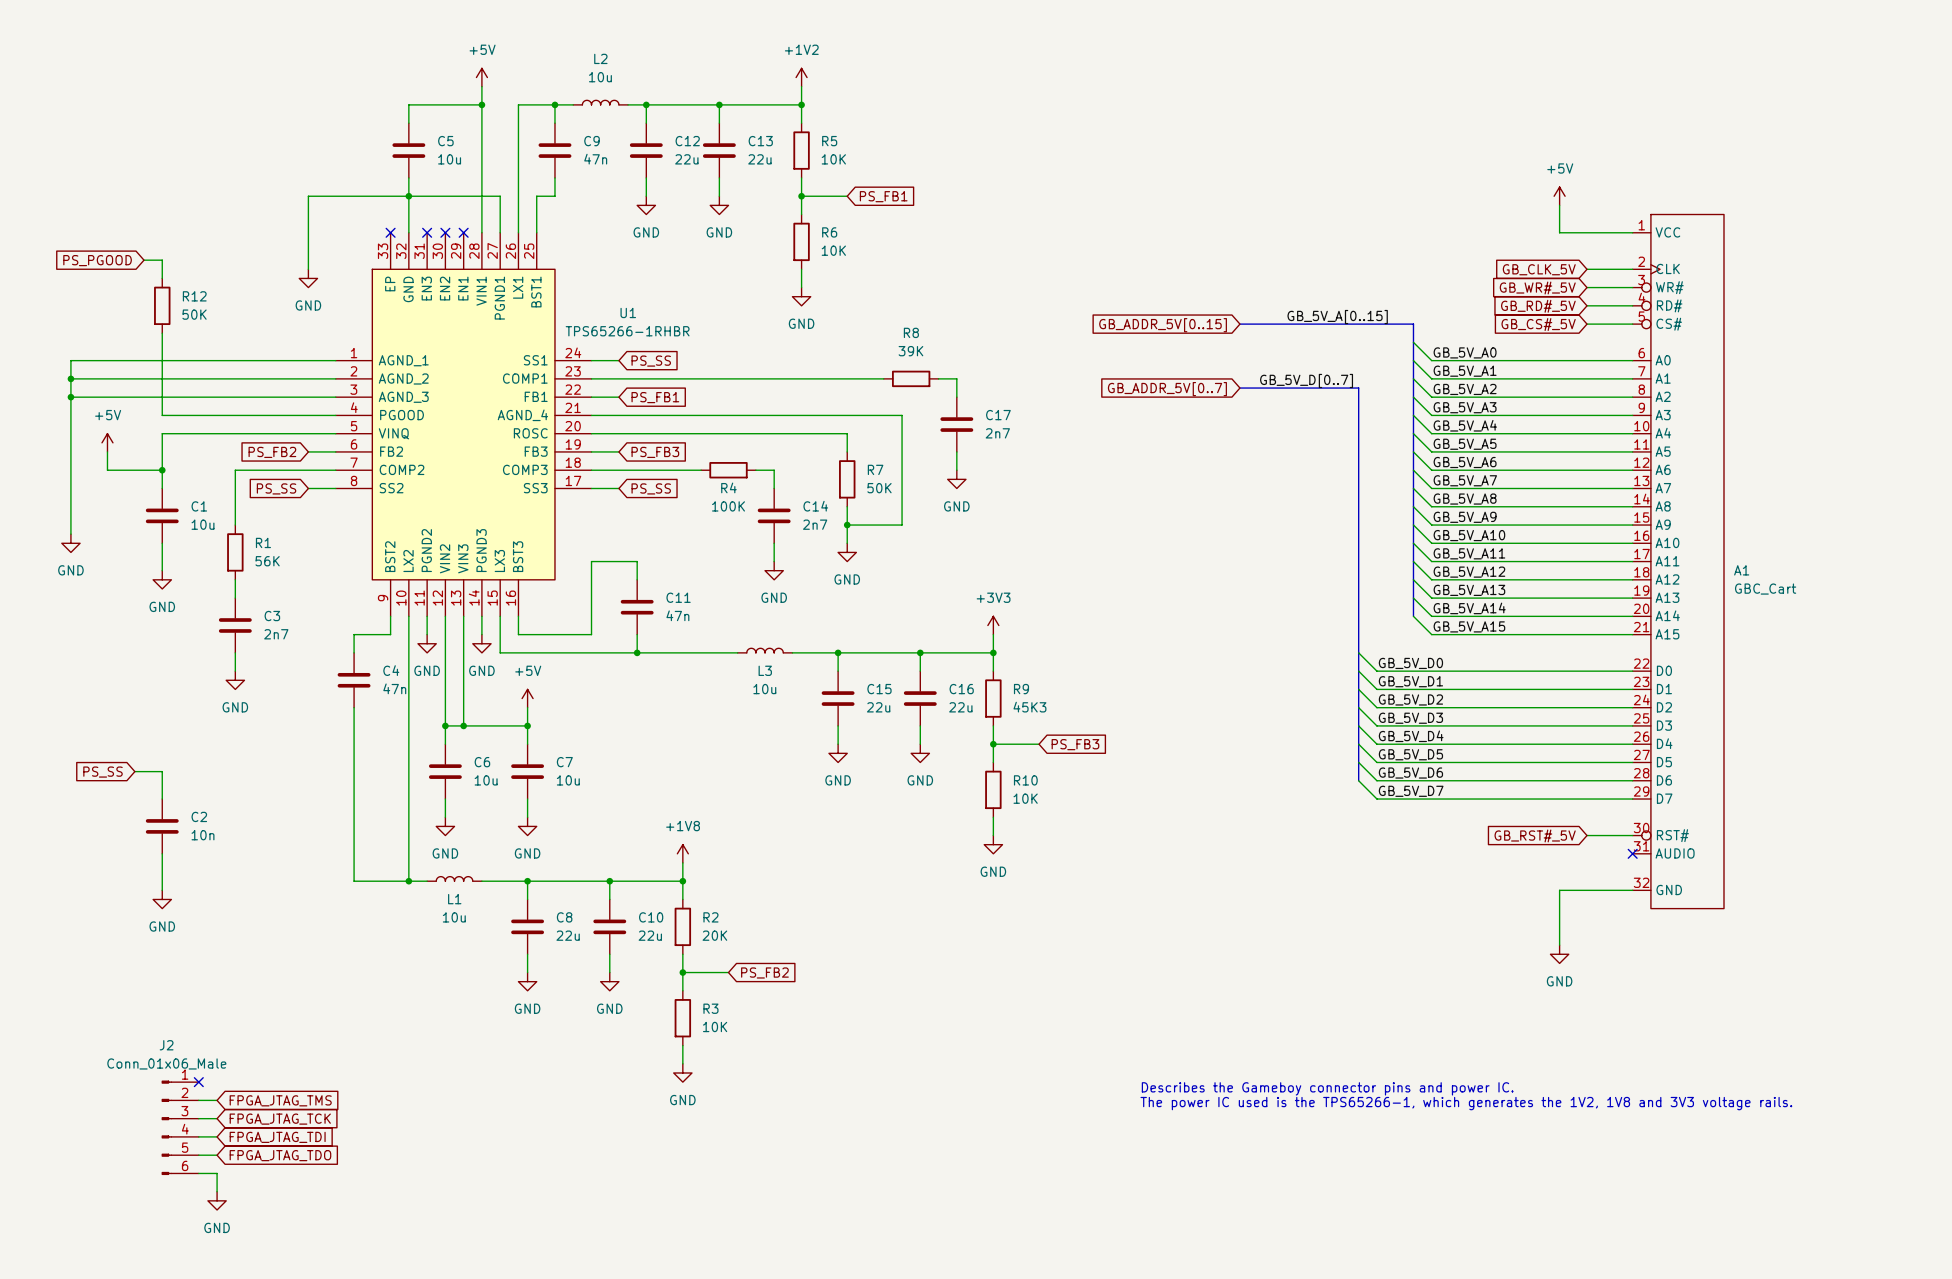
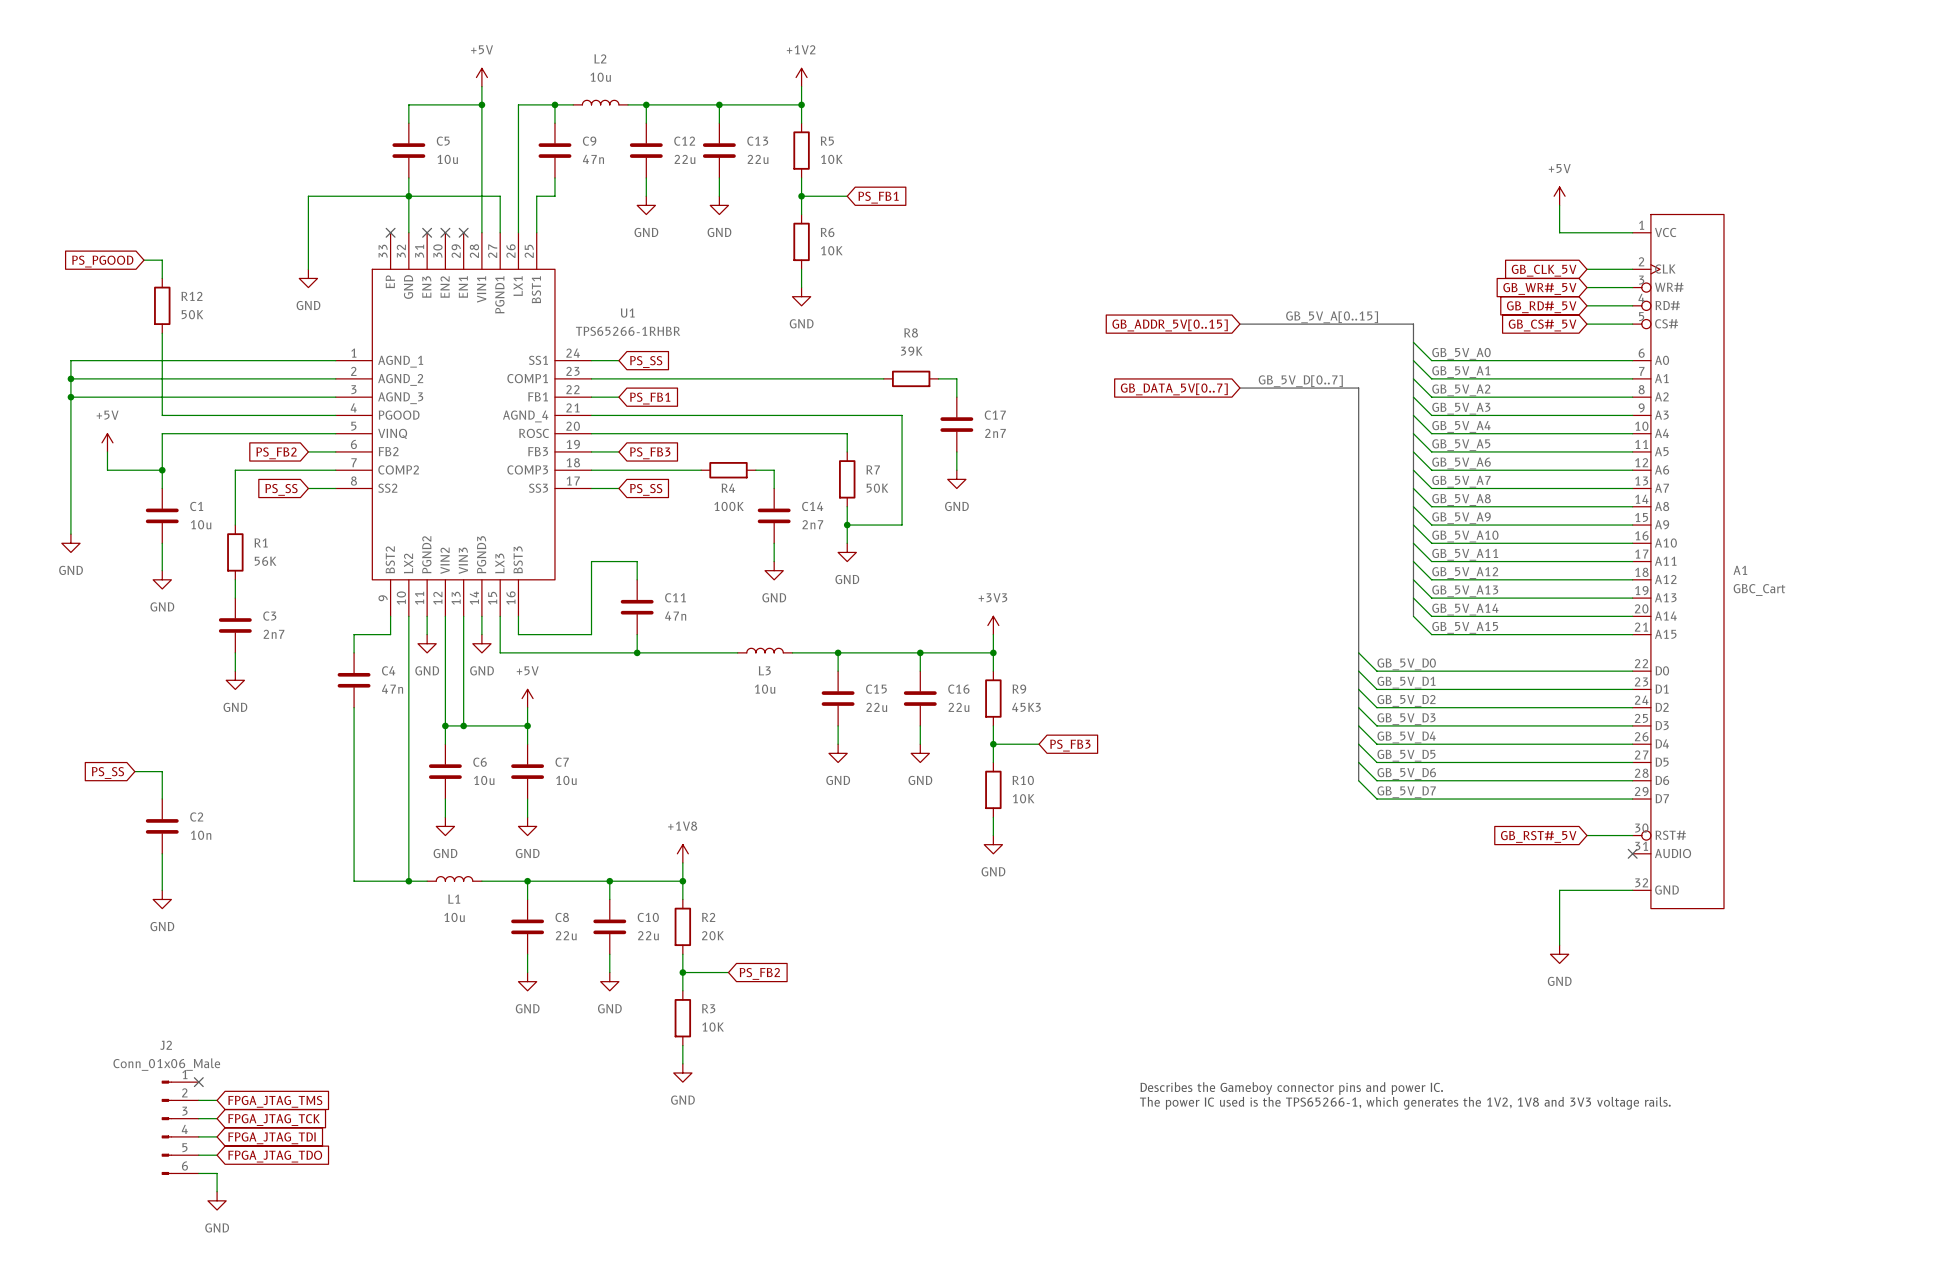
global label: GB_ADDR_5V[0..7] (1167, 389) -> GB_DATA_5V[0..7] (1174, 389)

